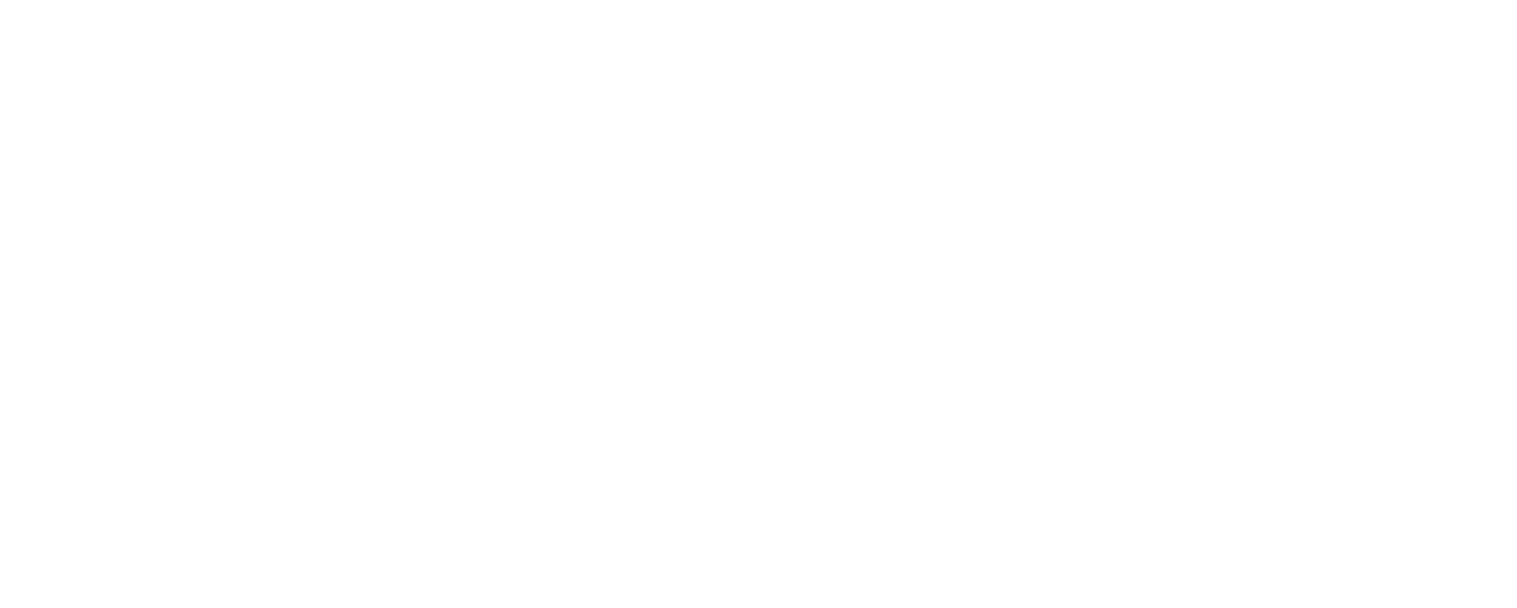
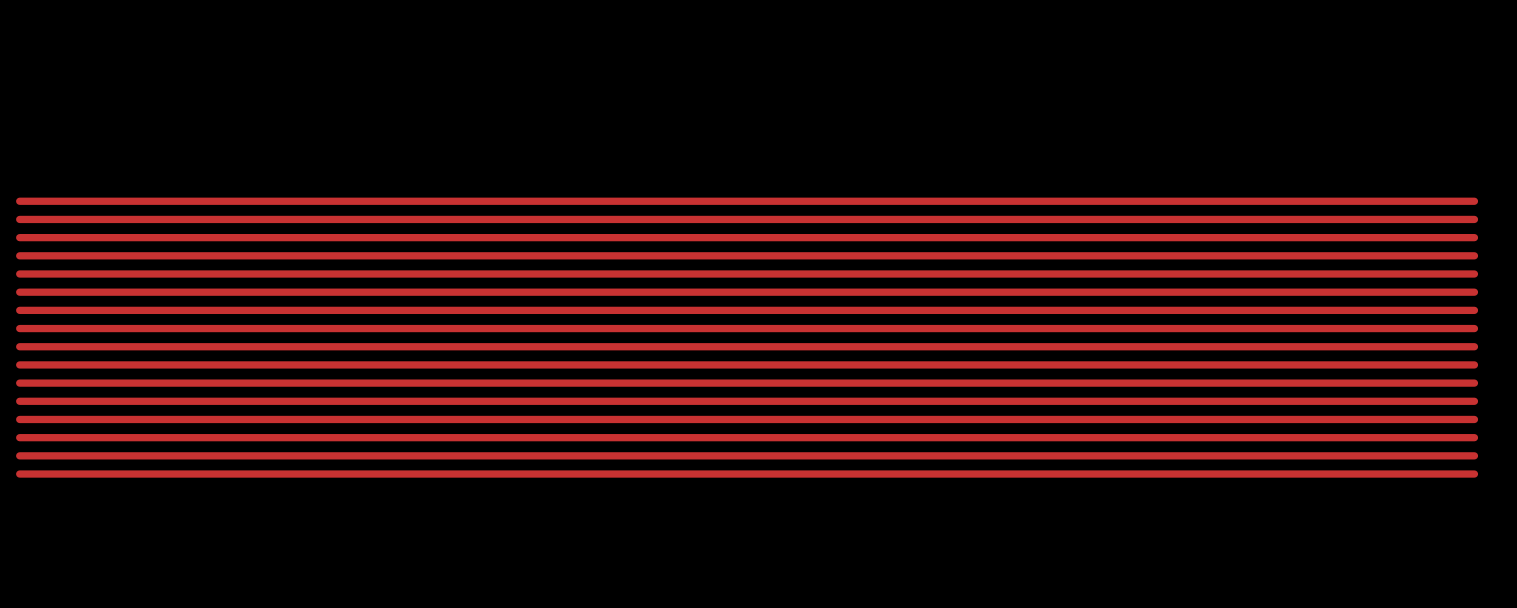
top track: none -> (1474, 201) (19, 201)
top track: none -> (1474, 219) (19, 219)
top track: none -> (1474, 237) (19, 237)
top track: none -> (1474, 255) (19, 255)
top track: none -> (1474, 274) (19, 274)
top track: none -> (1474, 292) (19, 292)
top track: none -> (1474, 310) (19, 310)
top track: none -> (1474, 328) (19, 328)
top track: none -> (1474, 346) (19, 346)
top track: none -> (1474, 364) (19, 364)
top track: none -> (1474, 383) (19, 383)
top track: none -> (1474, 401) (19, 401)
top track: none -> (1474, 419) (19, 419)
top track: none -> (1474, 437) (19, 437)
top track: none -> (1474, 455) (19, 455)
top track: none -> (1474, 474) (19, 474)

